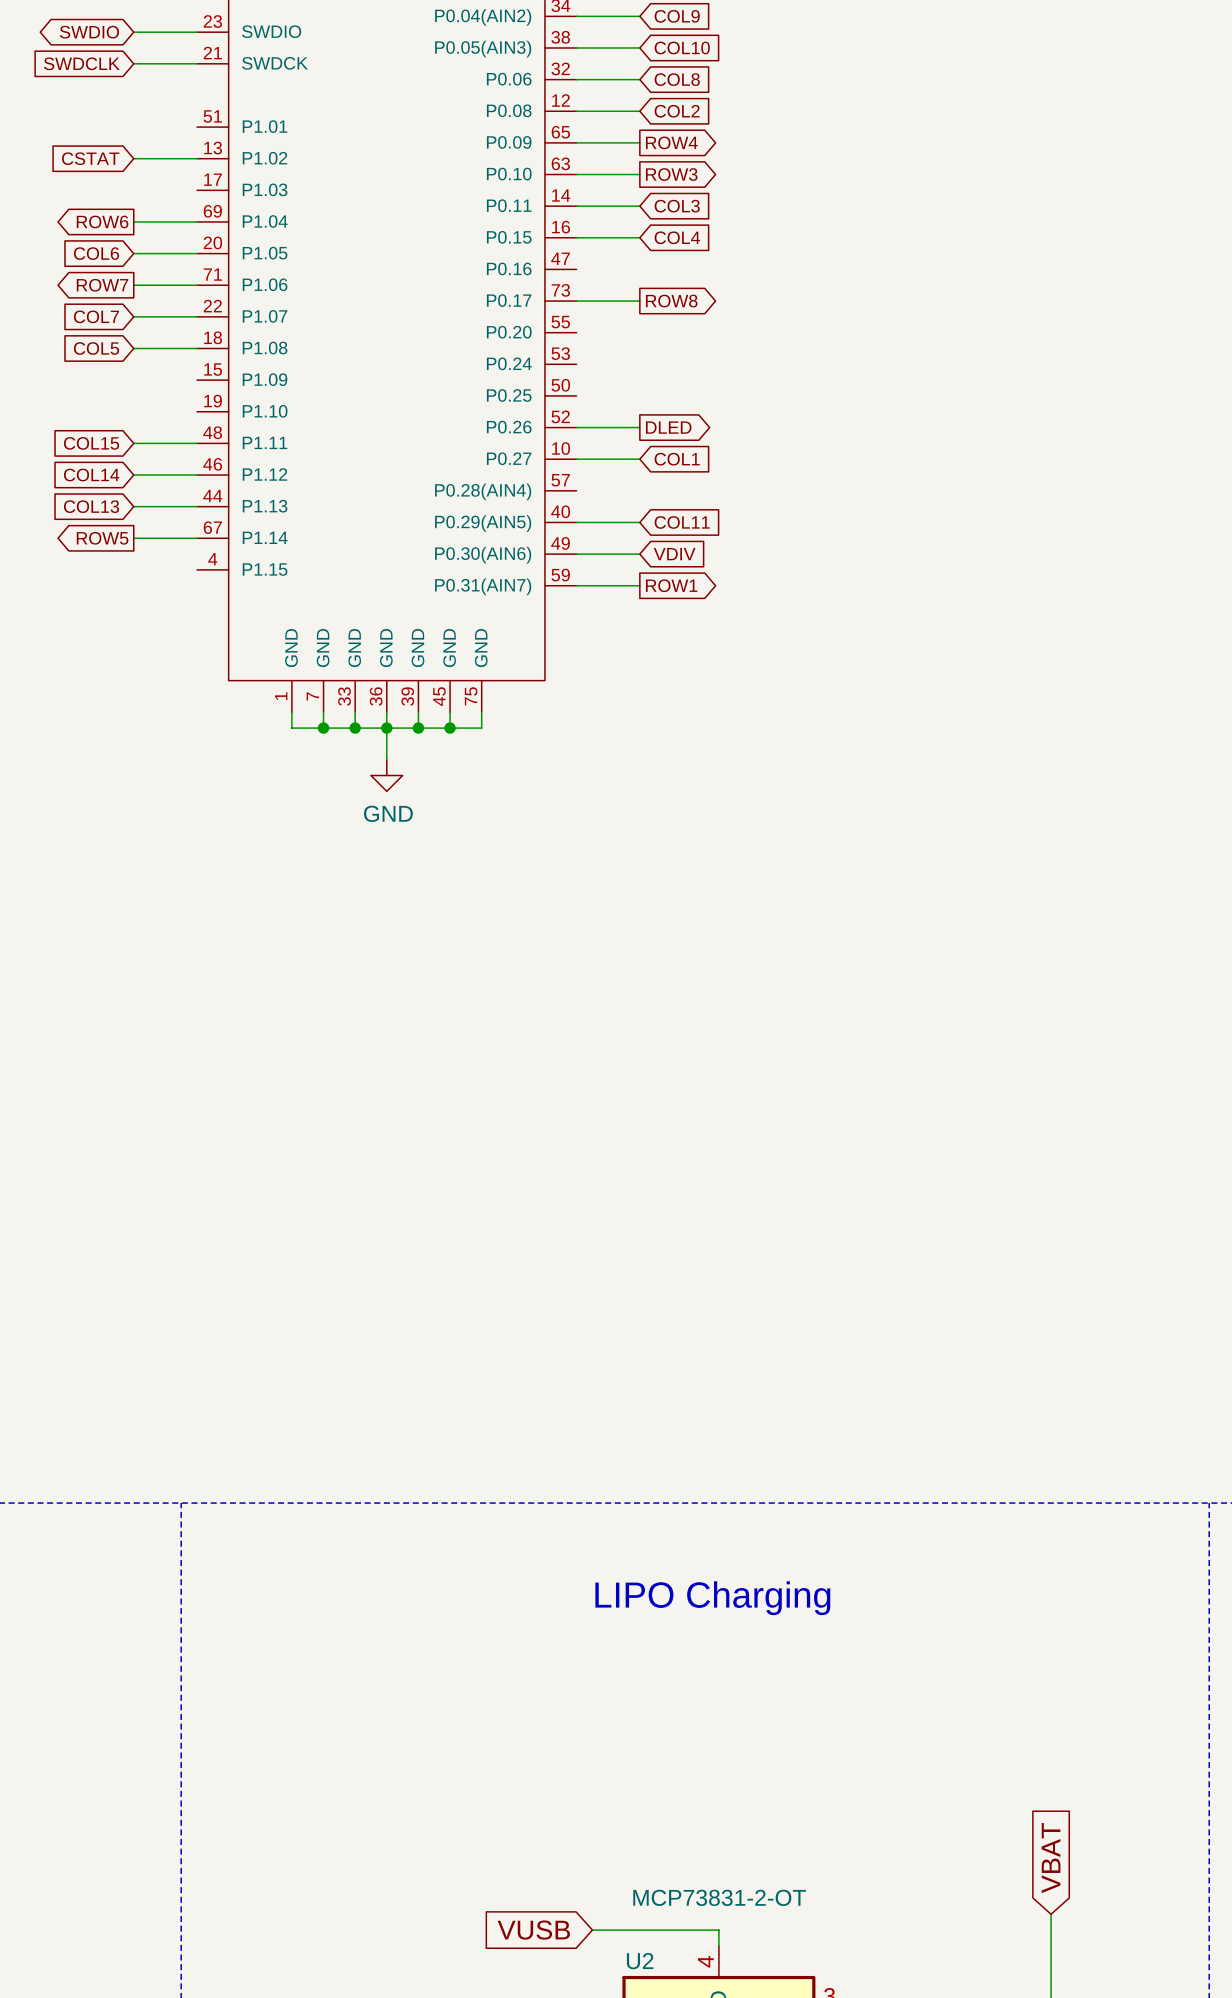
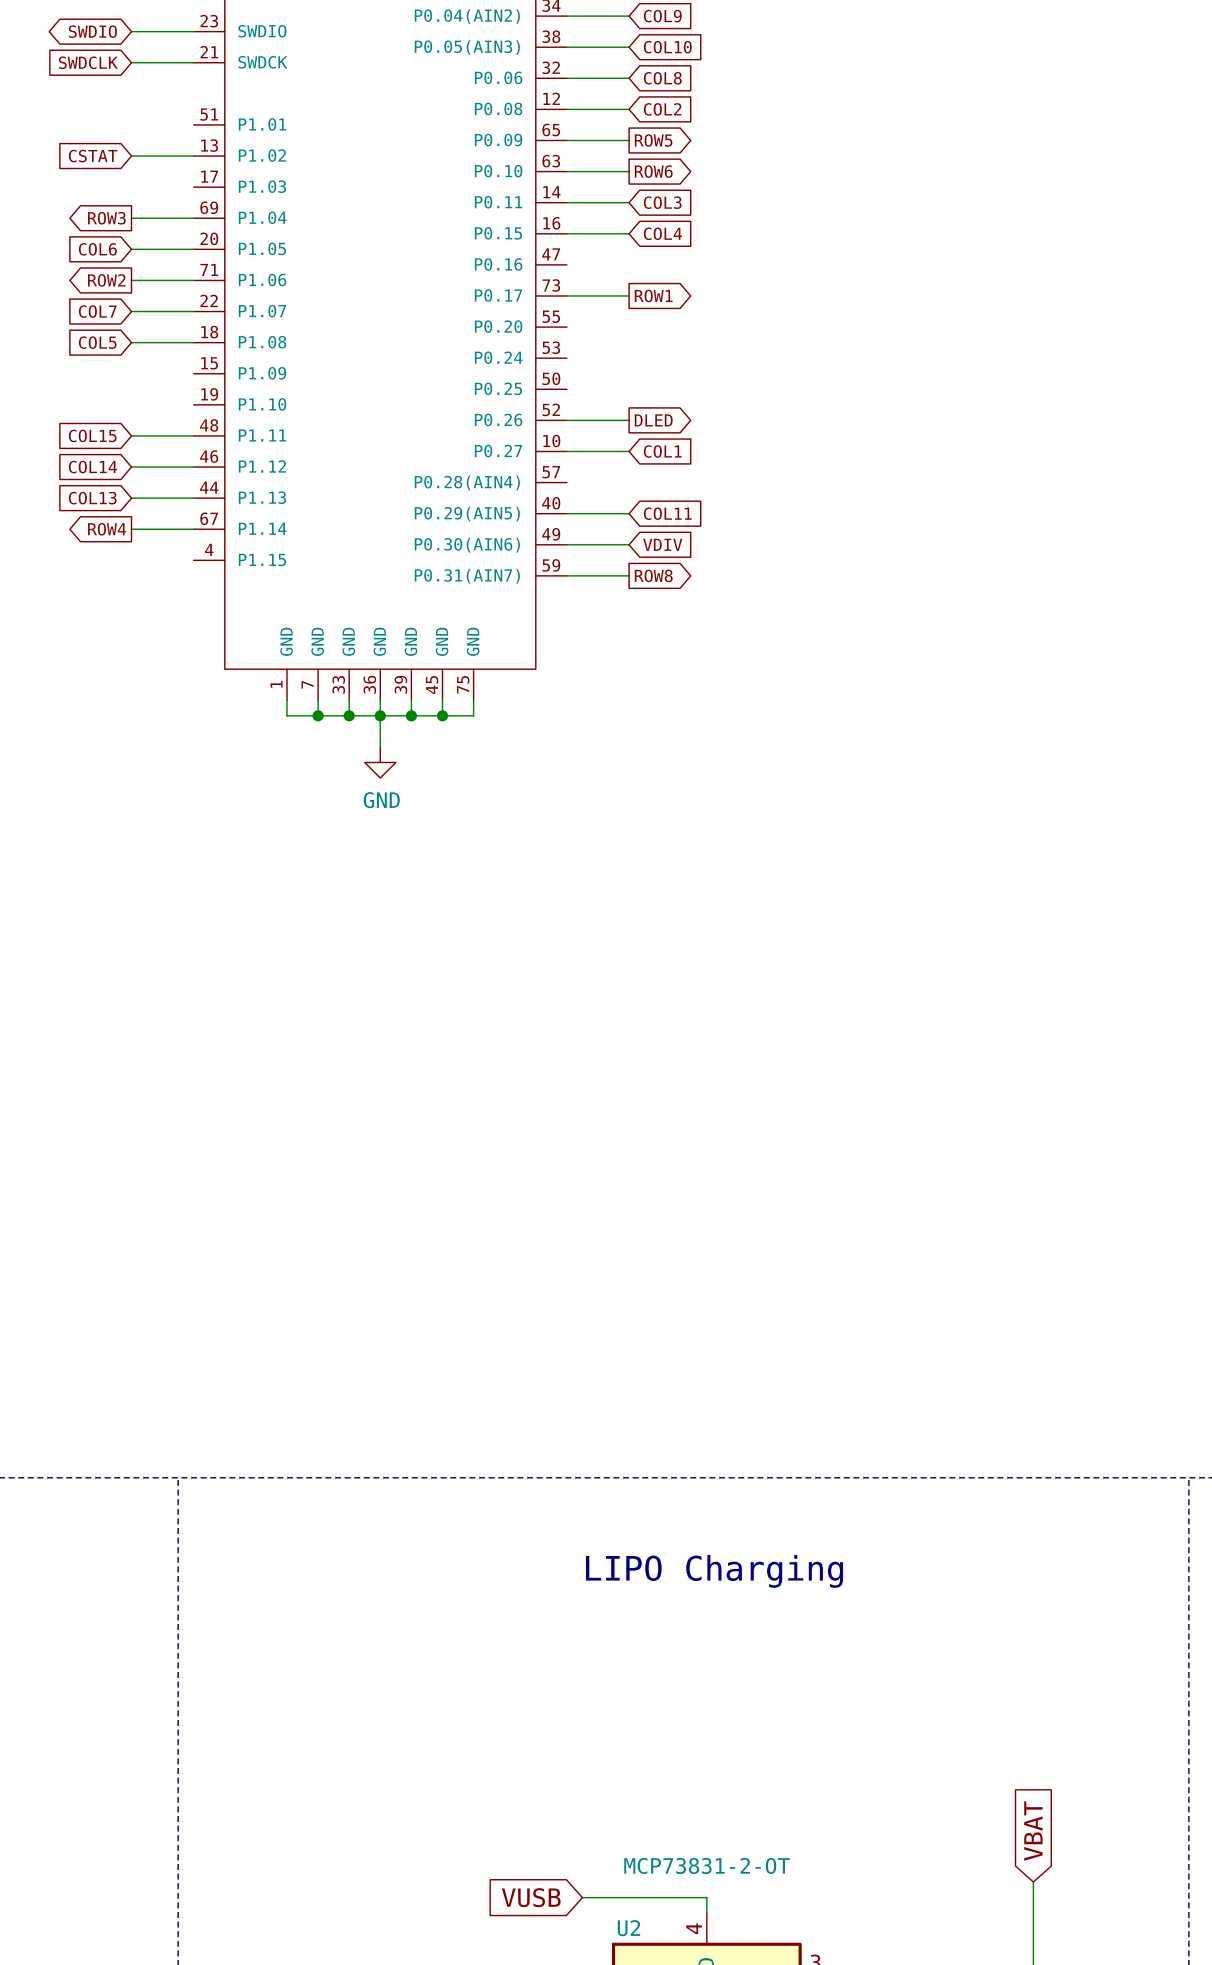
global label: ROW4 (671, 142) -> ROW5 (653, 140)
global label: ROW3 (671, 174) -> ROW6 (653, 171)
global label: ROW6 (102, 221) -> ROW3 (106, 218)
global label: ROW7 (102, 285) -> ROW2 (106, 280)
global label: ROW8 (671, 301) -> ROW1 (653, 296)
global label: ROW5 (102, 538) -> ROW4 (107, 529)
global label: ROW1 (671, 585) -> ROW8 (653, 575)

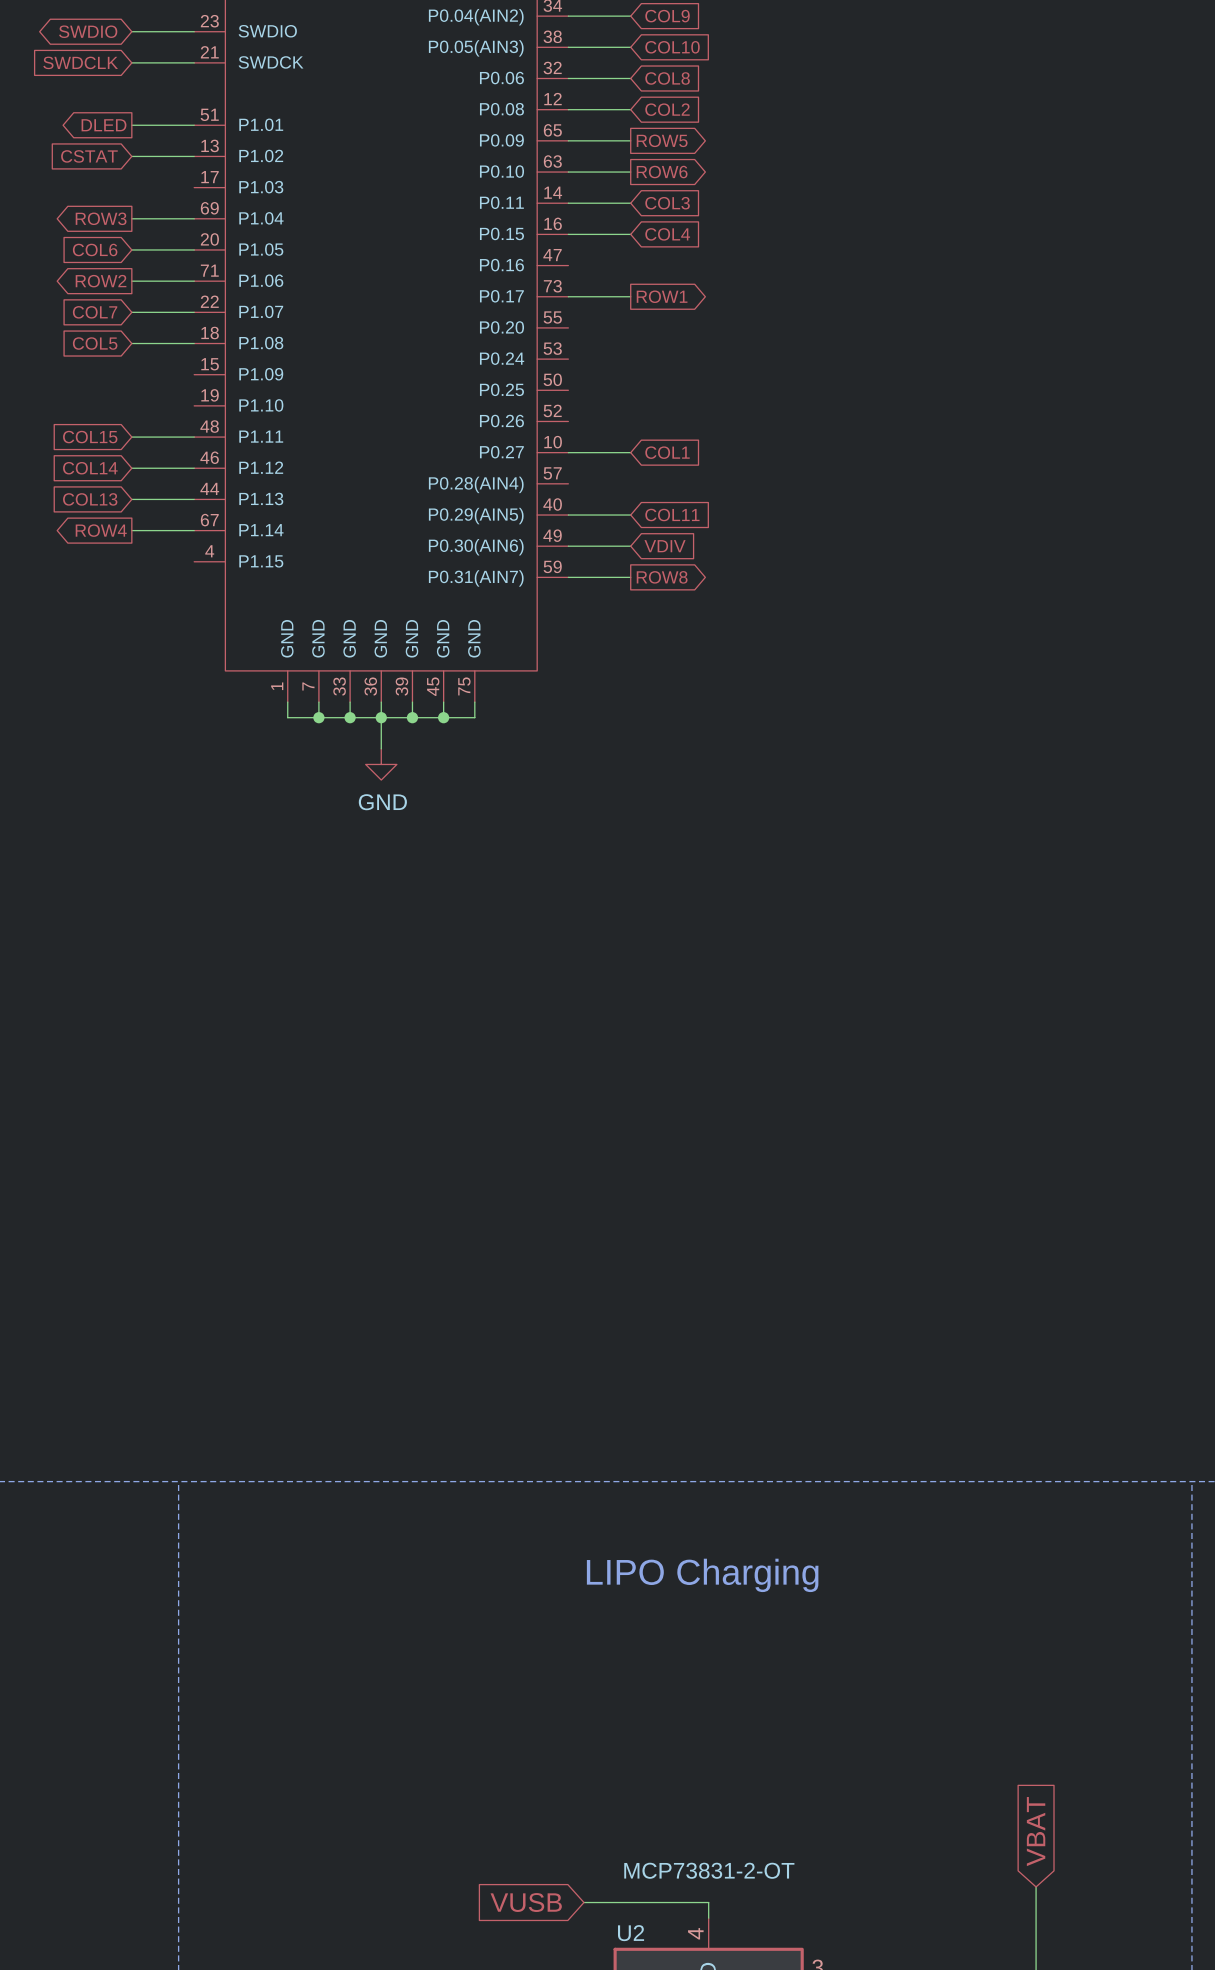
global label: none -> DLED (104, 125)
wire: none -> (131, 125) (194, 125)
wire: (566, 420) (629, 420) -> none
global label: DLED (653, 420) -> none

